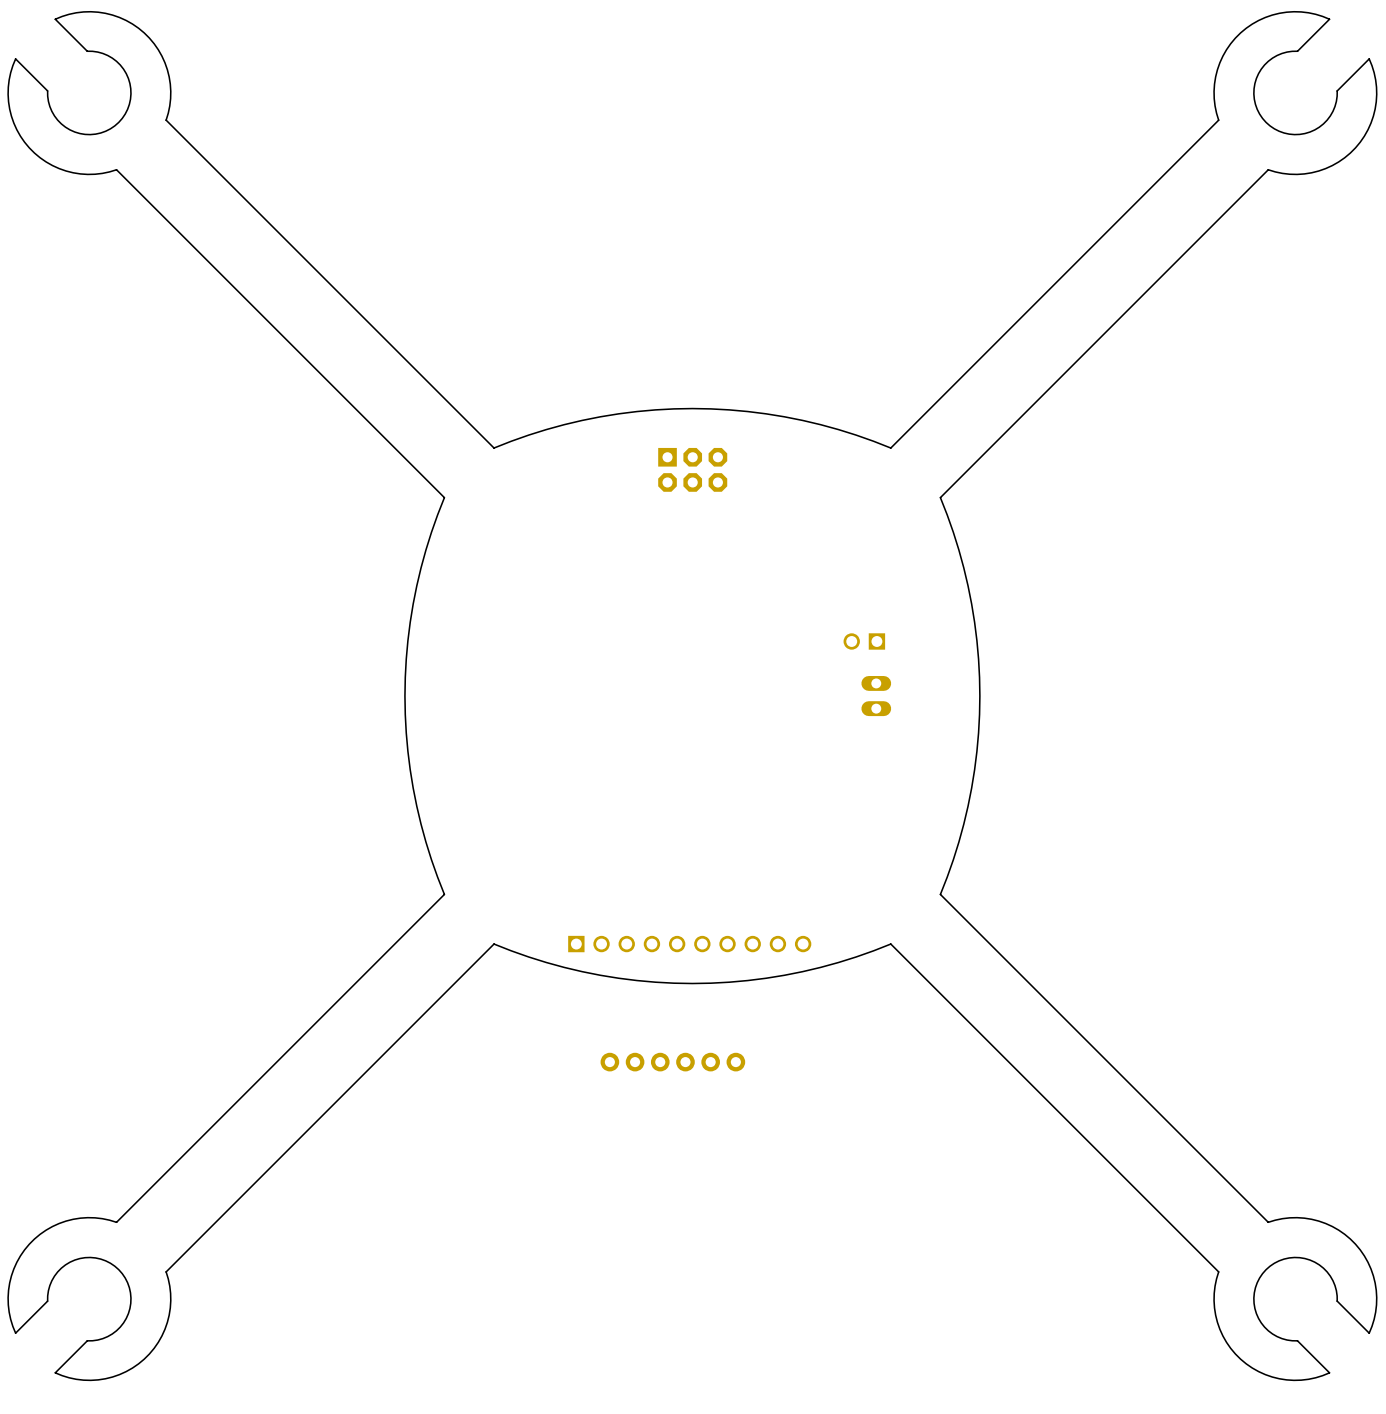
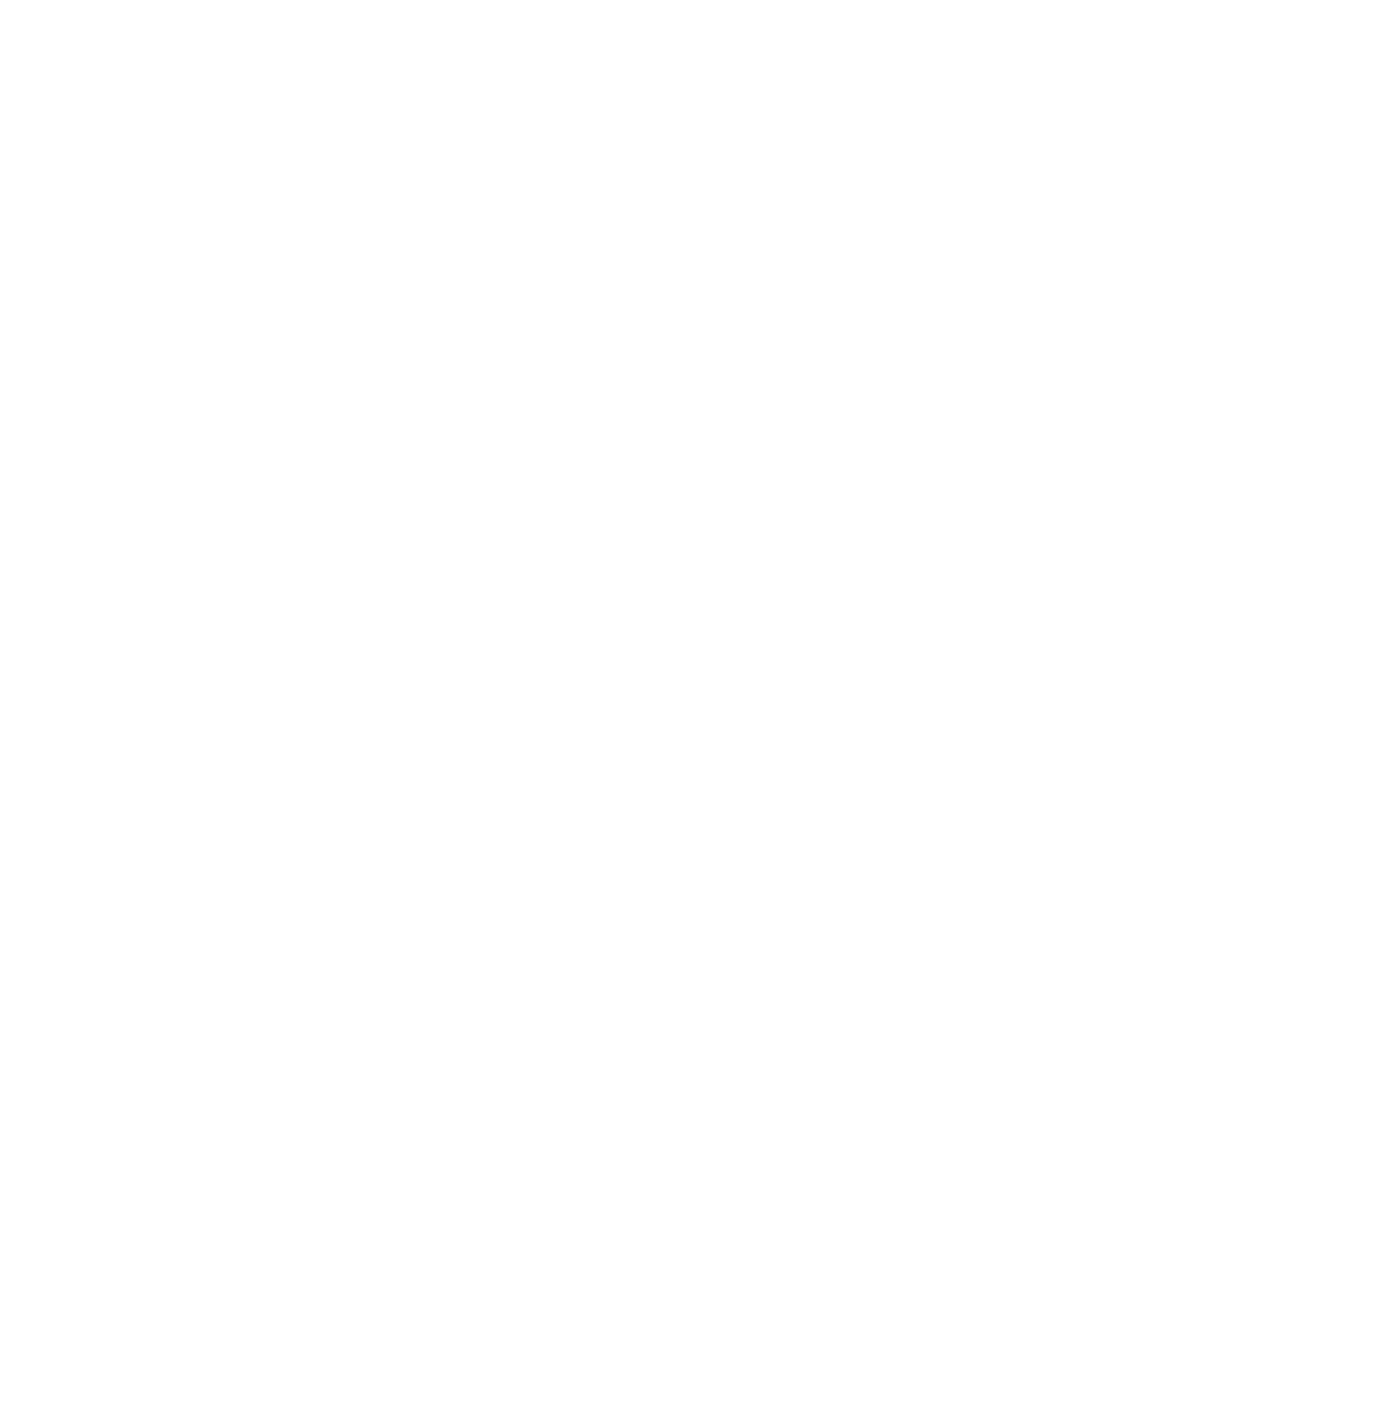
board edge: (1329, 19) (1297, 51) (1281, 53) (1264, 65) (1254, 83) (1255, 104) (1262, 118) (1274, 128) (1289, 134) (1309, 132) (1327, 120) (1334, 106) (1337, 90) (1369, 58) (1375, 79) (1376, 101) (1370, 123) (1360, 142) (1344, 157) (1318, 171) (1297, 174) (1268, 169) (940, 497) (958, 549) (971, 603) (978, 659) (979, 696) (978, 733) (971, 788) (958, 842) (940, 894) (1268, 1222) (1297, 1217) (1318, 1221) (1338, 1230) (1355, 1244) (1367, 1262) (1376, 1290) (1375, 1312) (1369, 1333) (1337, 1301) (1334, 1285) (1323, 1268) (1304, 1258) (1284, 1259) (1270, 1266) (1259, 1278) (1254, 1292) (1256, 1313) (1268, 1330) (1281, 1338) (1297, 1340) (1329, 1372) (1308, 1379) (1286, 1379) (1265, 1374) (1246, 1363) (1230, 1348) (1217, 1322) (1214, 1300) (1218, 1271) (890, 944) (838, 962) (784, 975) (729, 982) (692, 983) (655, 982) (600, 975) (546, 962) (494, 944) (166, 1271) (170, 1300) (167, 1322) (158, 1342) (144, 1359) (126, 1371) (98, 1379) (76, 1379) (55, 1372) (87, 1340) (102, 1338) (120, 1327) (129, 1308) (129, 1287) (122, 1273) (110, 1263) (95, 1257) (74, 1260) (57, 1271) (49, 1285) (47, 1301) (15, 1333) (9, 1312) (8, 1290) (13, 1268) (24, 1249) (40, 1234) (66, 1221) (87, 1217) (116, 1222) (444, 894) (425, 842) (413, 788) (406, 733) (404, 696) (406, 659) (413, 603) (425, 549) (444, 497) (116, 169) (87, 174) (66, 171) (46, 161) (29, 147) (16, 129) (8, 101) (9, 79) (15, 58) (47, 90) (49, 106) (61, 123) (79, 133) (100, 133) (114, 125) (125, 114) (130, 99) (128, 78) (116, 61) (102, 53) (87, 51) (55, 19) (76, 12) (98, 12) (119, 17) (138, 28) (154, 43) (167, 69) (170, 91) (166, 120) (494, 448) (546, 429) (600, 416) (655, 409) (692, 408) (729, 409) (784, 416) (838, 429) (890, 448) (1218, 120) (1214, 91) (1217, 69) (1226, 49) (1240, 32) (1258, 20) (1286, 12) (1308, 12) (1329, 19) -> none
part: (692, 469) -> none
part: (864, 641) -> none
part: (876, 696) -> none
part: (689, 944) -> none
part: (672, 1062) -> none

